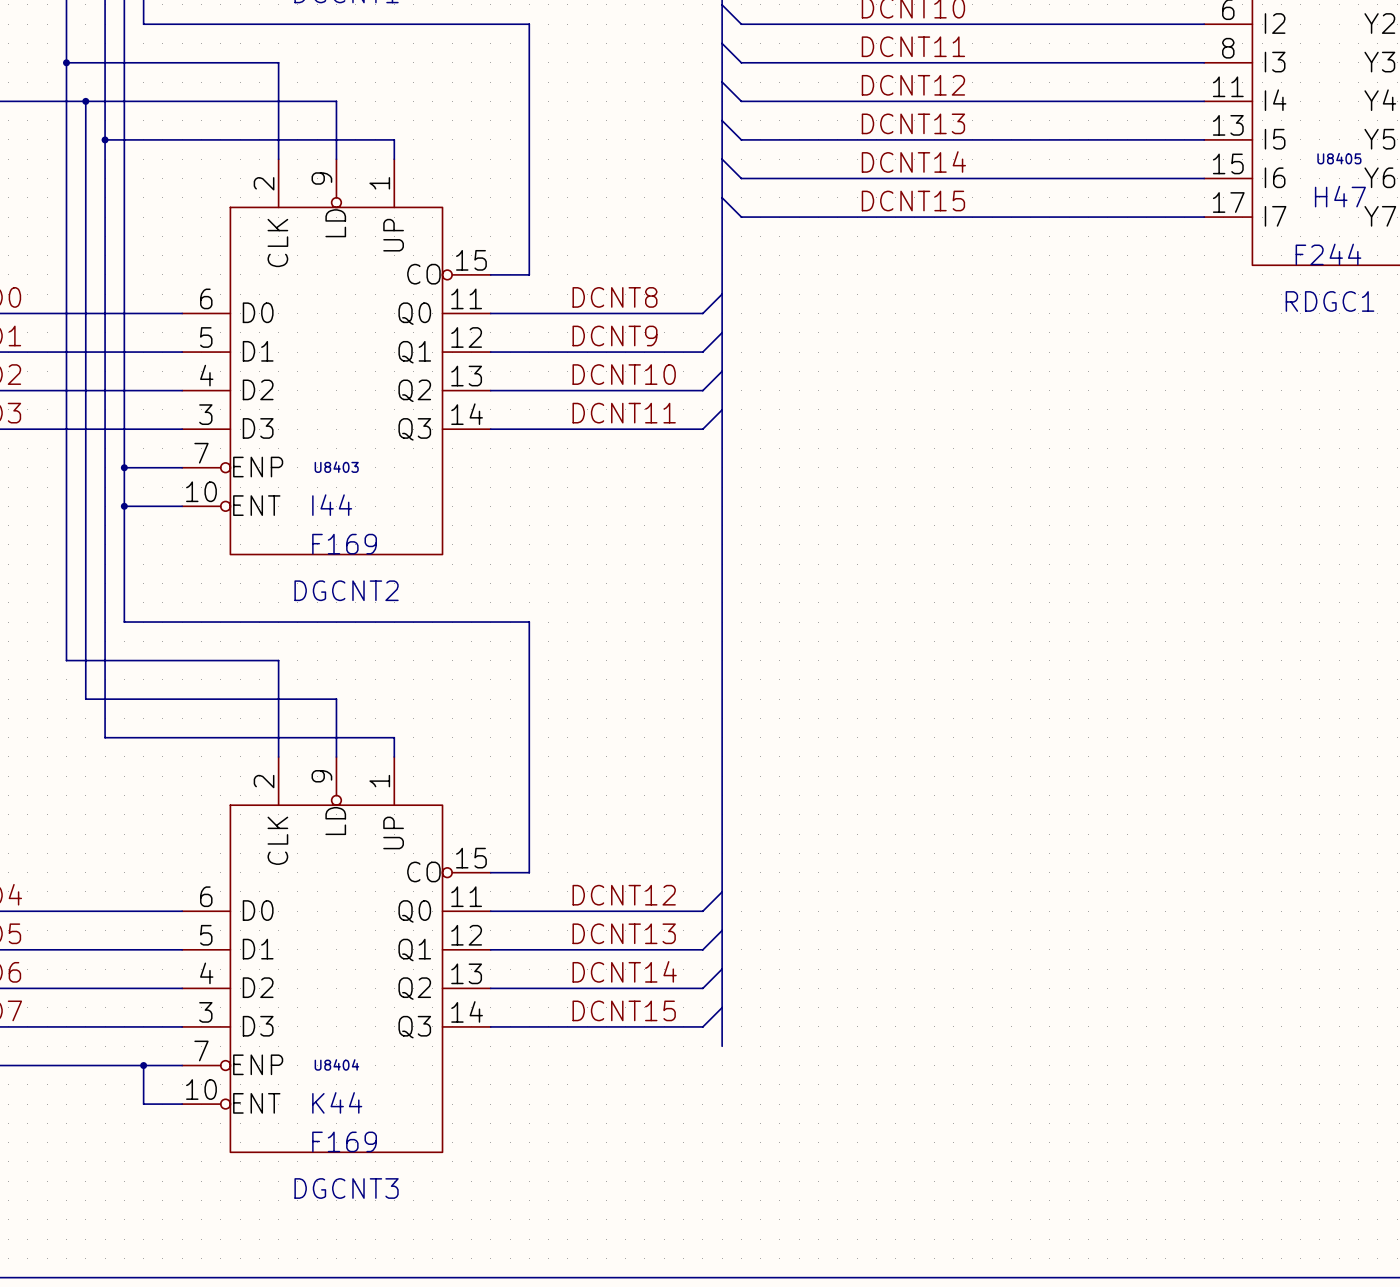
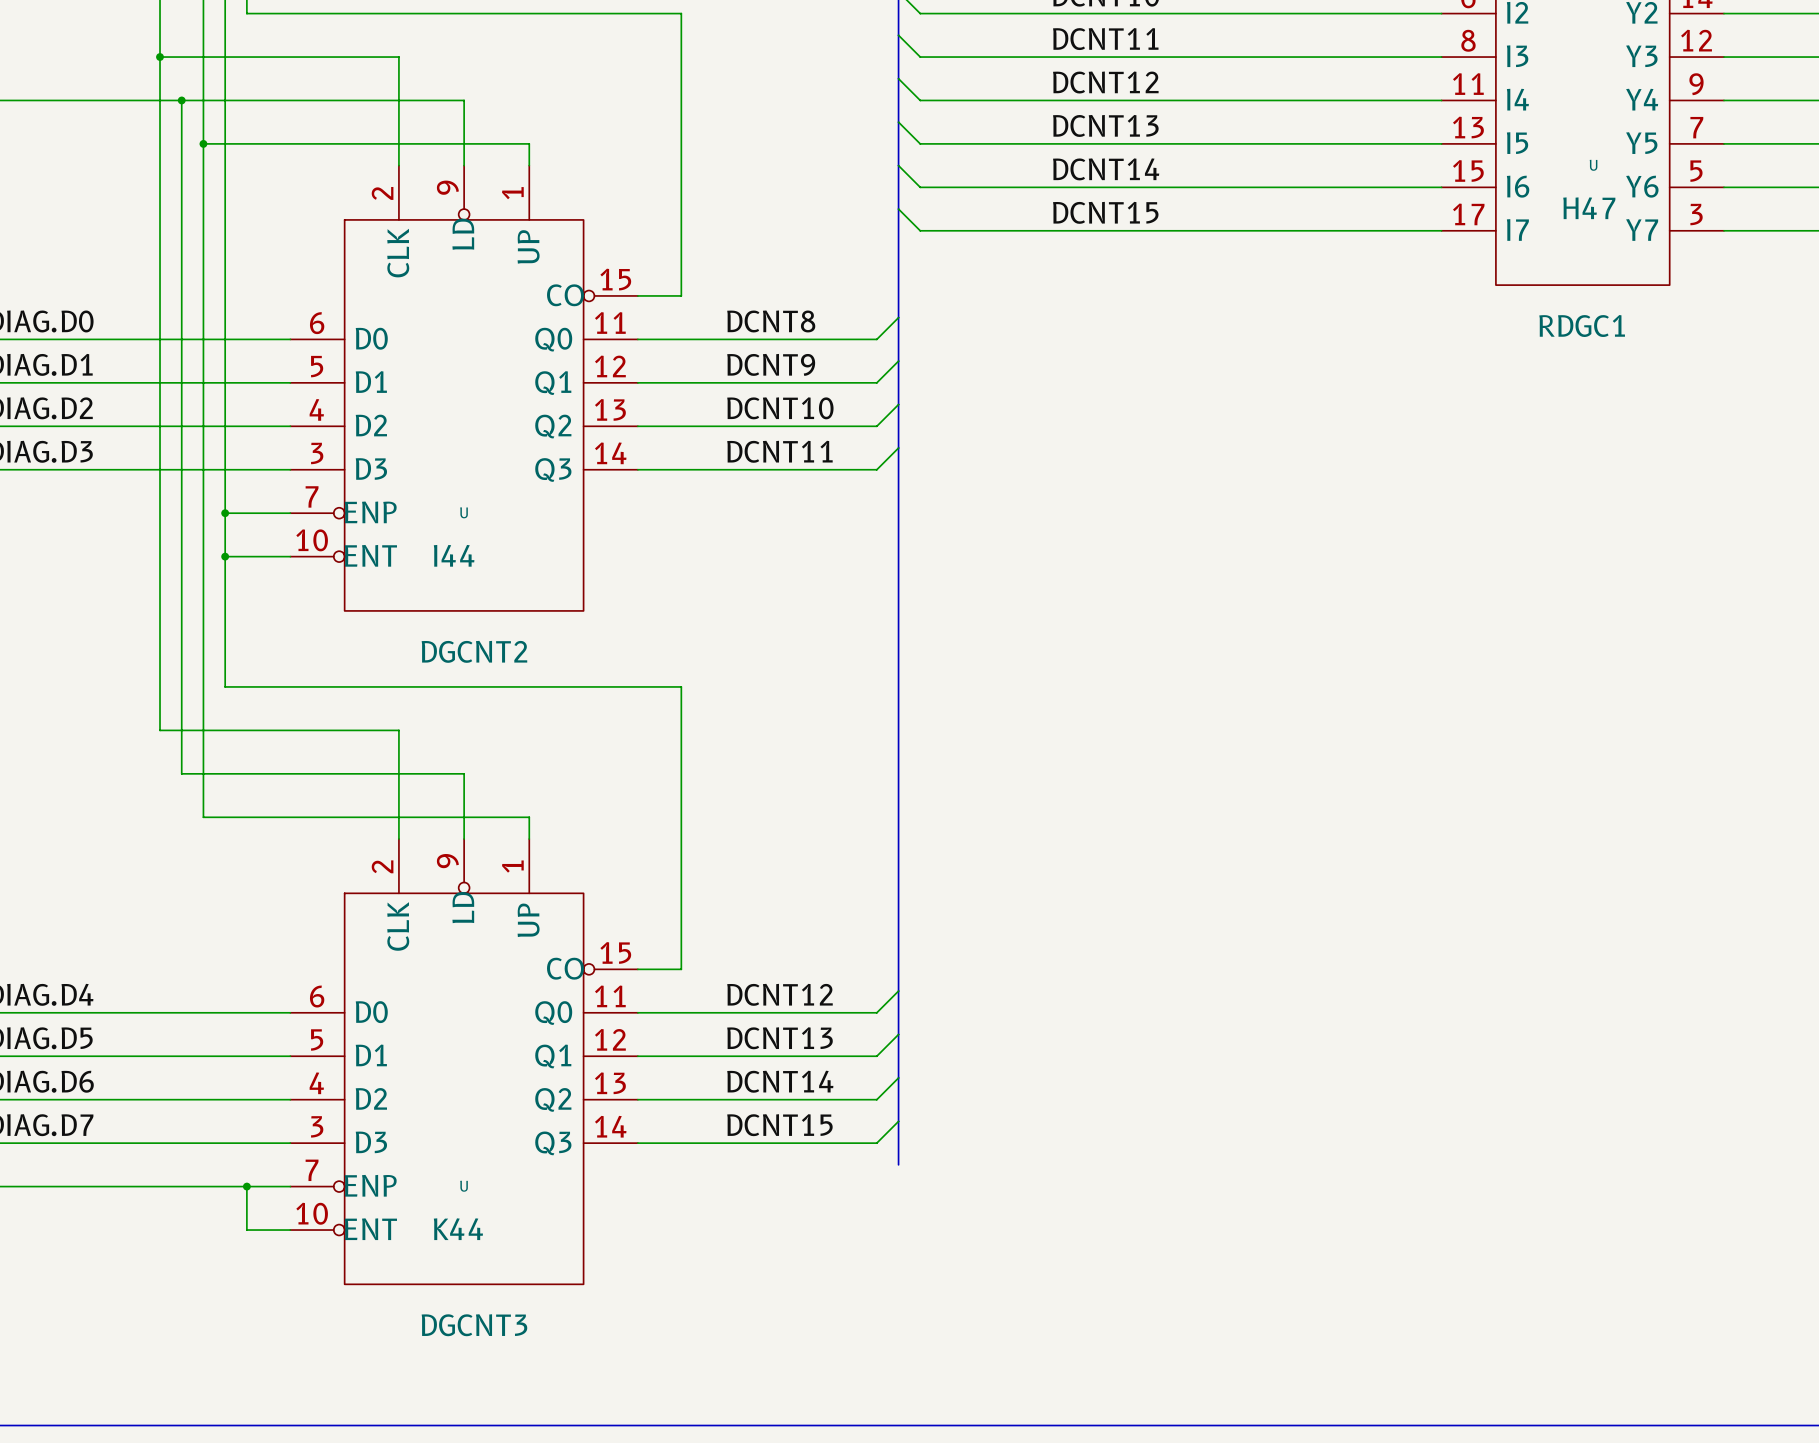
U8405 name: U8405 (1339, 158) -> U (1593, 165)
U8405 value: F244 (1328, 254) -> none
U8403 name: U8403 (336, 467) -> U (464, 512)
U8403 value: F169 (344, 544) -> none
U8404 name: U8404 (336, 1064) -> U (464, 1186)
U8404 value: F169 (344, 1141) -> none

